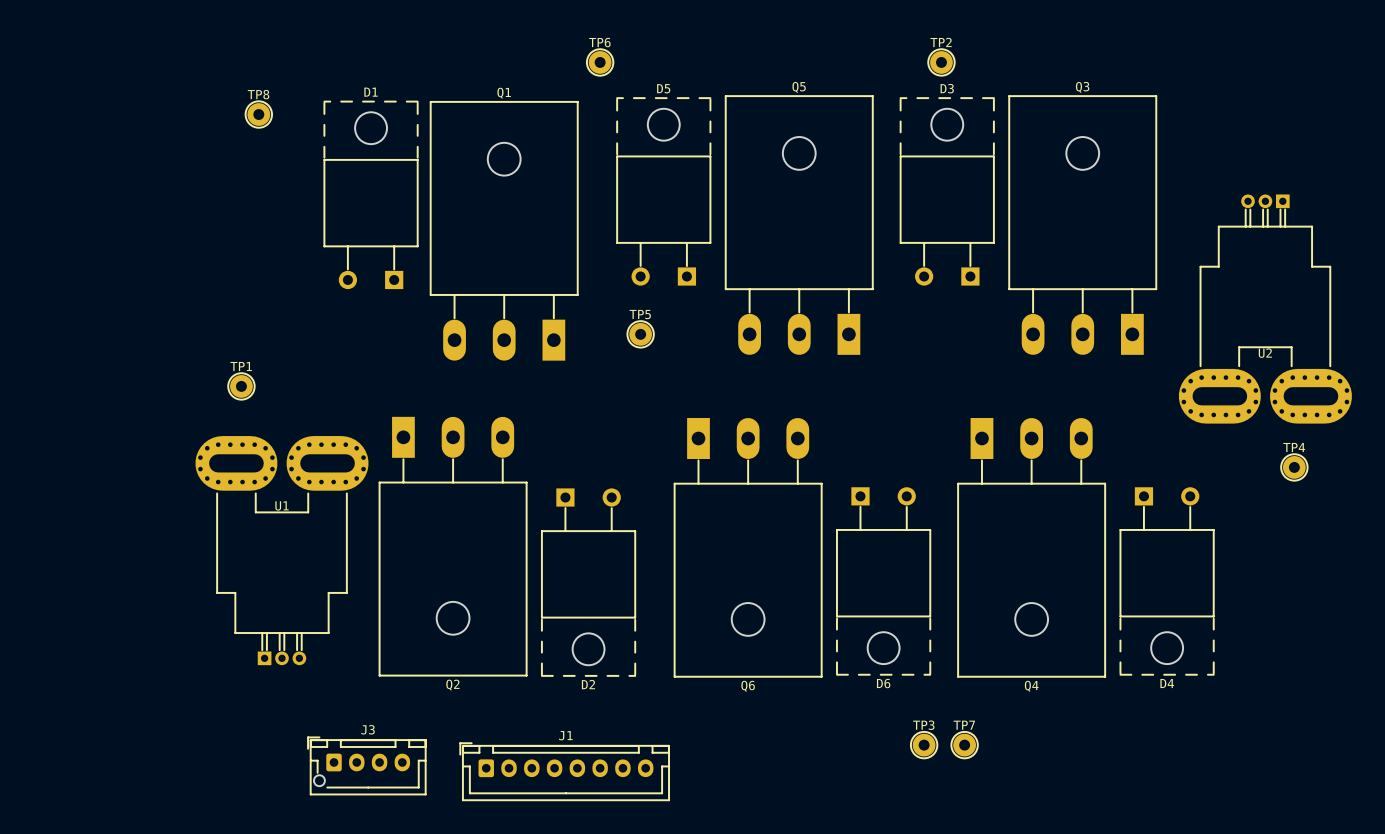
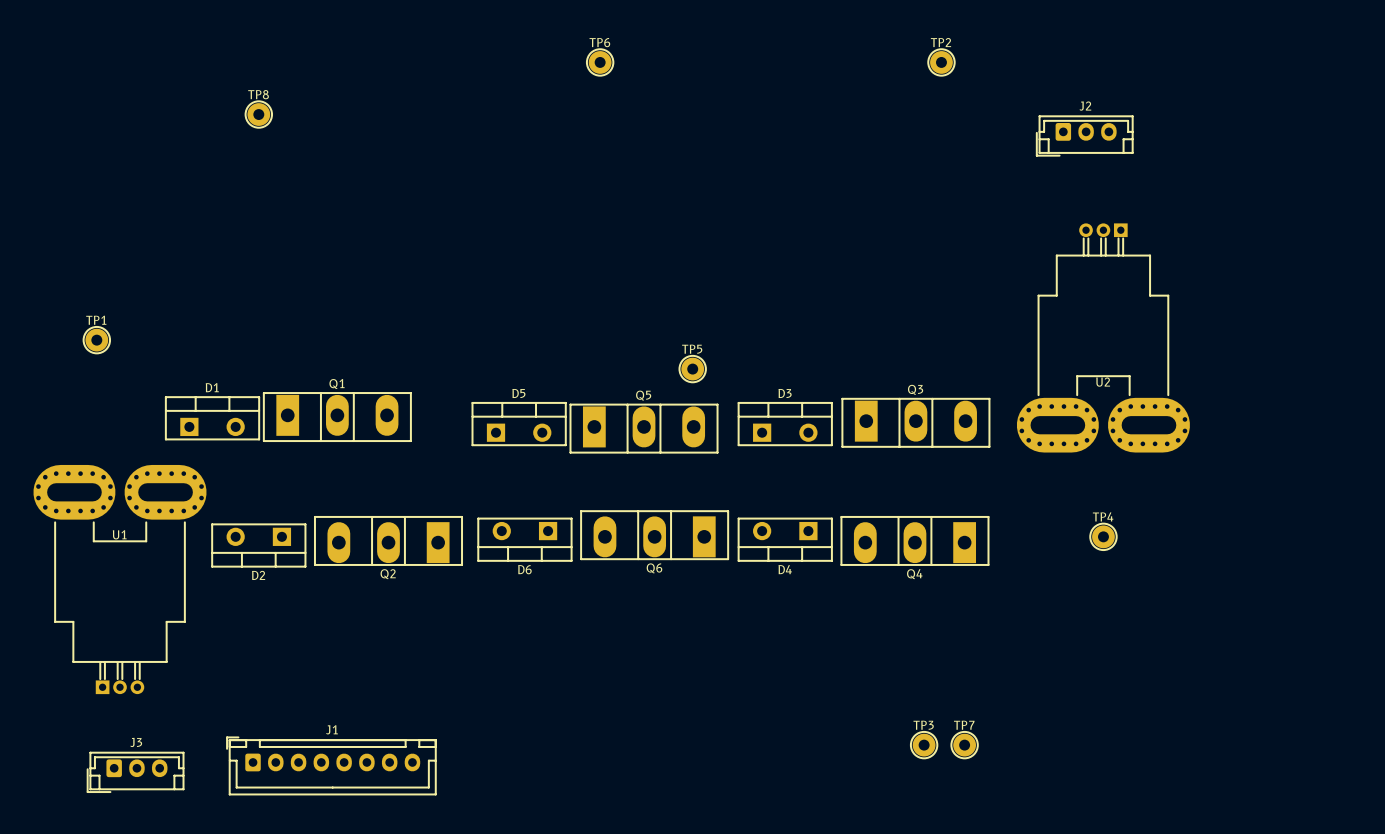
Q5 name position: Q5 (799, 87) -> Q5 (643, 395)
Q3 name position: Q3 (1082, 87) -> Q3 (915, 389)
D5 name position: D5 (663, 88) -> D5 (518, 393)
D3 name position: D3 (947, 88) -> D3 (785, 393)
D1 name position: D1 (371, 92) -> D1 (212, 387)
Q1 name position: Q1 (504, 93) -> Q1 (337, 384)
Q5 footprint: [725, 95, 874, 355] -> [569, 404, 719, 454]
Q3 footprint: [1008, 95, 1157, 355] -> [841, 398, 990, 448]
D5 footprint: [616, 97, 711, 286] -> [471, 402, 567, 446]
D3 footprint: [900, 97, 995, 286] -> [738, 402, 833, 446]
D1 footprint: [323, 101, 419, 290] -> [165, 396, 260, 440]
Q1 footprint: [430, 101, 579, 361] -> [263, 392, 412, 442]
J2: none -> (1084, 135)
U2 position: (1265, 309) -> (1103, 337)
TP5 position: (640, 334) -> (692, 369)
TP1 position: (241, 386) -> (96, 340)
Q2 footprint: [379, 416, 528, 677] -> [314, 516, 463, 566]
Q6 footprint: [674, 418, 823, 678] -> [580, 510, 729, 560]
Q4 footprint: [957, 418, 1106, 678] -> [840, 516, 990, 566]
TP4 position: (1294, 467) -> (1103, 536)
D6 footprint: [836, 487, 931, 676] -> [477, 518, 573, 562]
D4 footprint: [1119, 487, 1215, 676] -> [738, 518, 833, 562]
D2 footprint: [541, 488, 636, 677] -> [211, 523, 307, 568]
U1 position: (281, 550) -> (120, 579)
D6 name position: D6 (883, 683) -> D6 (524, 569)
D4 name position: D4 (1167, 683) -> D4 (785, 569)
D2 name position: D2 (588, 684) -> D2 (258, 575)
Q2 name position: Q2 (452, 685) -> Q2 (388, 574)
Q6 name position: Q6 (748, 686) -> Q6 (654, 568)
Q4 name position: Q4 (1031, 686) -> Q4 (914, 574)
J3 footprint: [307, 736, 427, 796] -> [87, 752, 185, 793]
J1 position: (564, 771) -> (331, 765)

